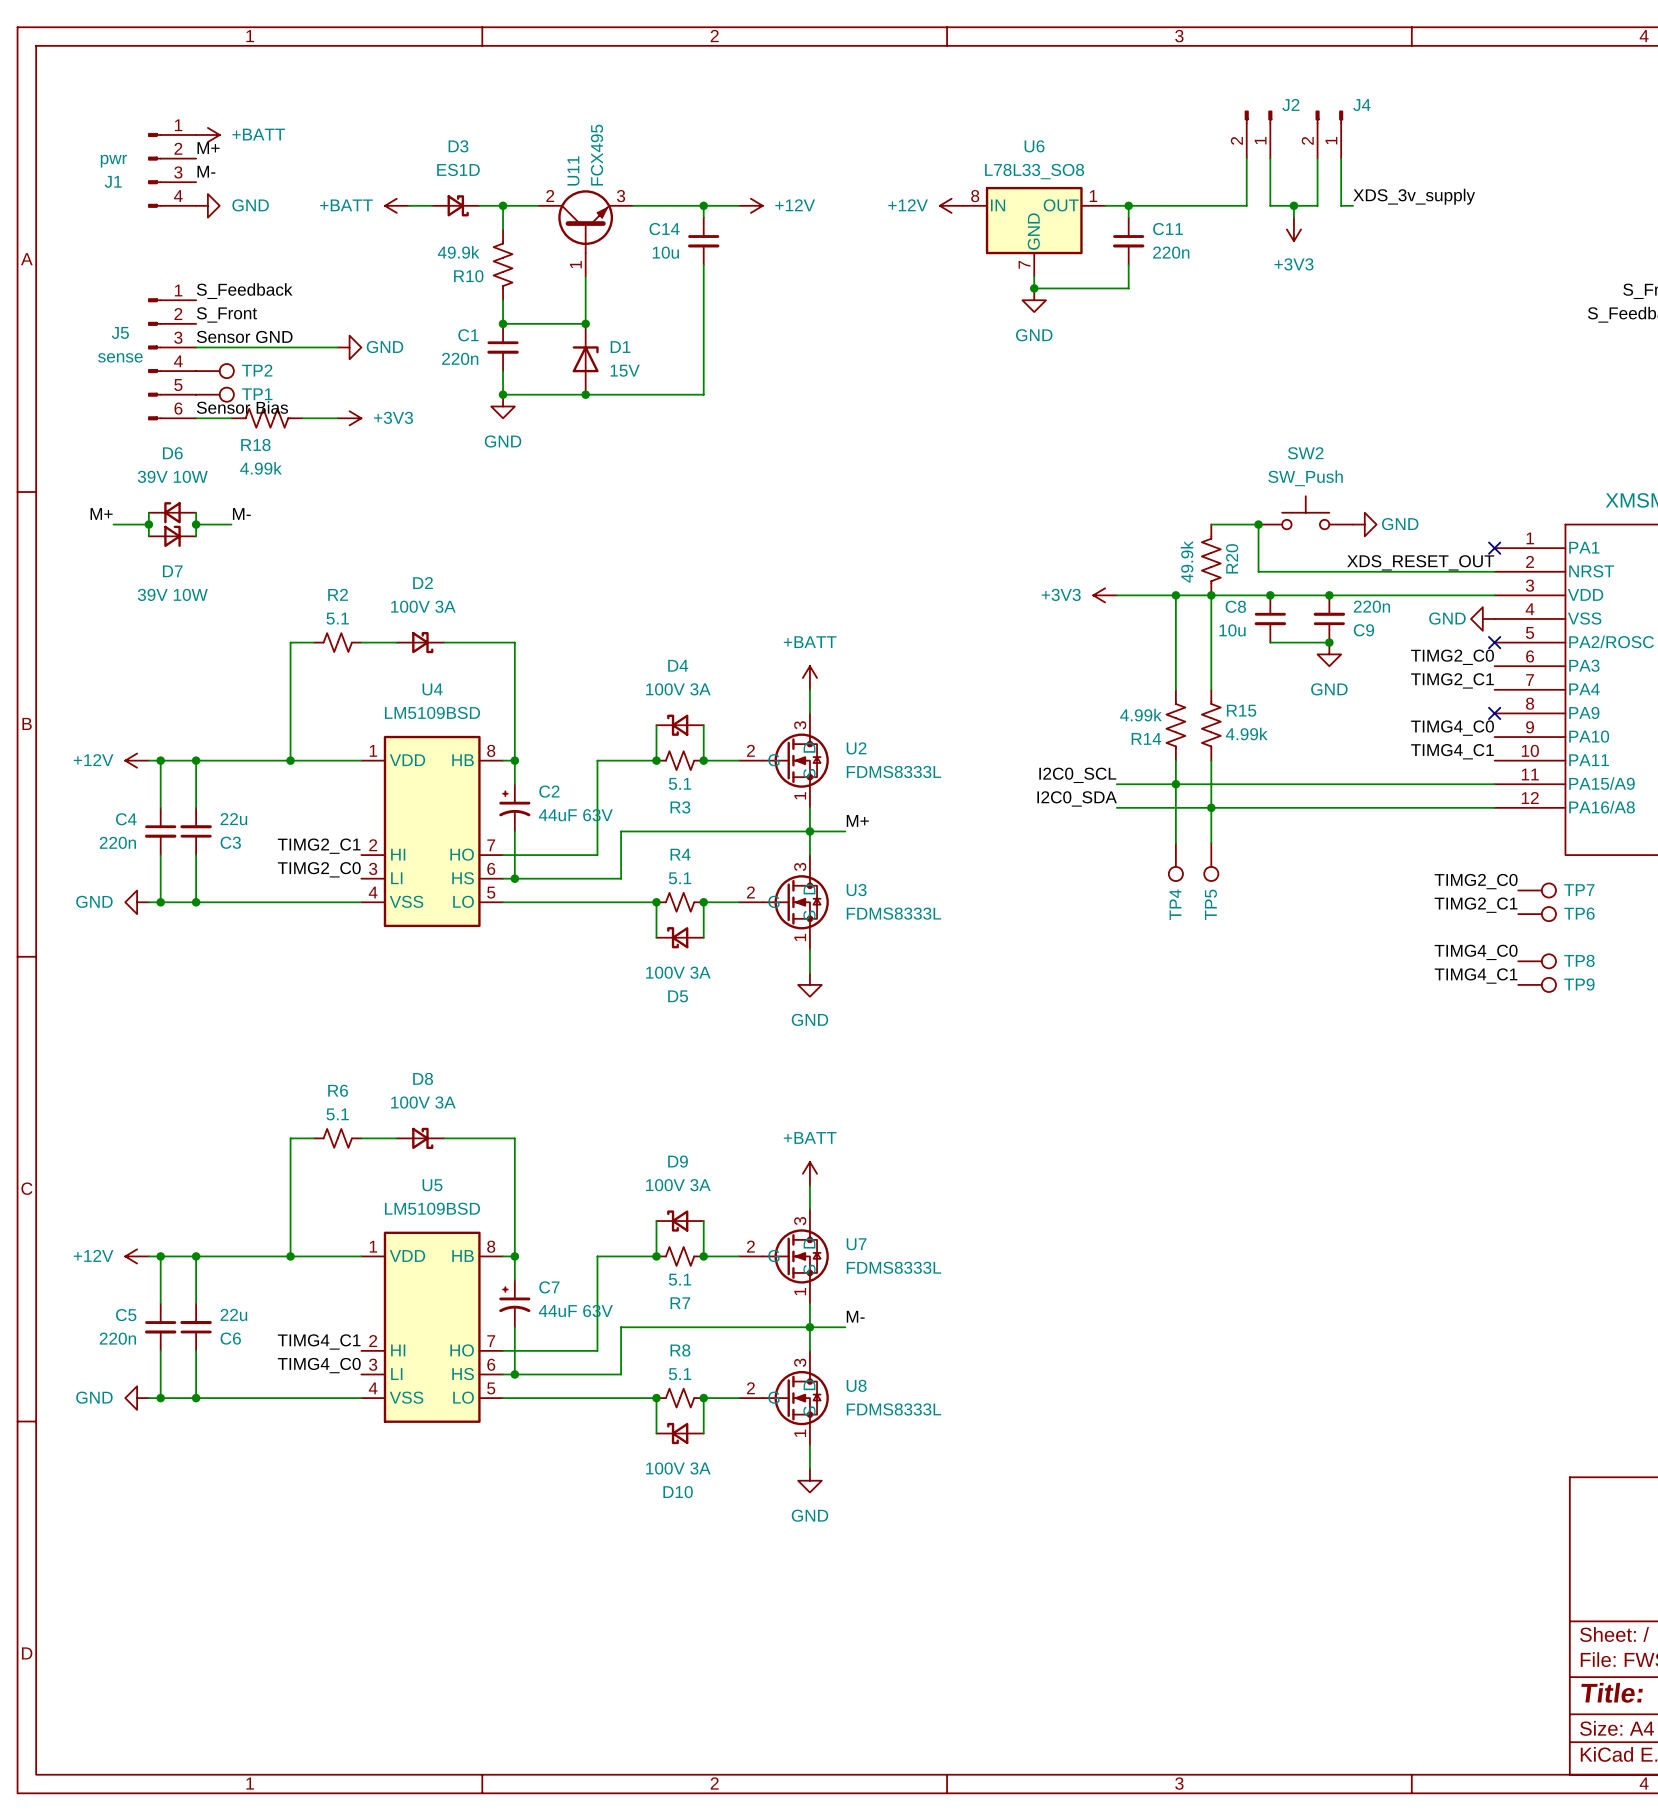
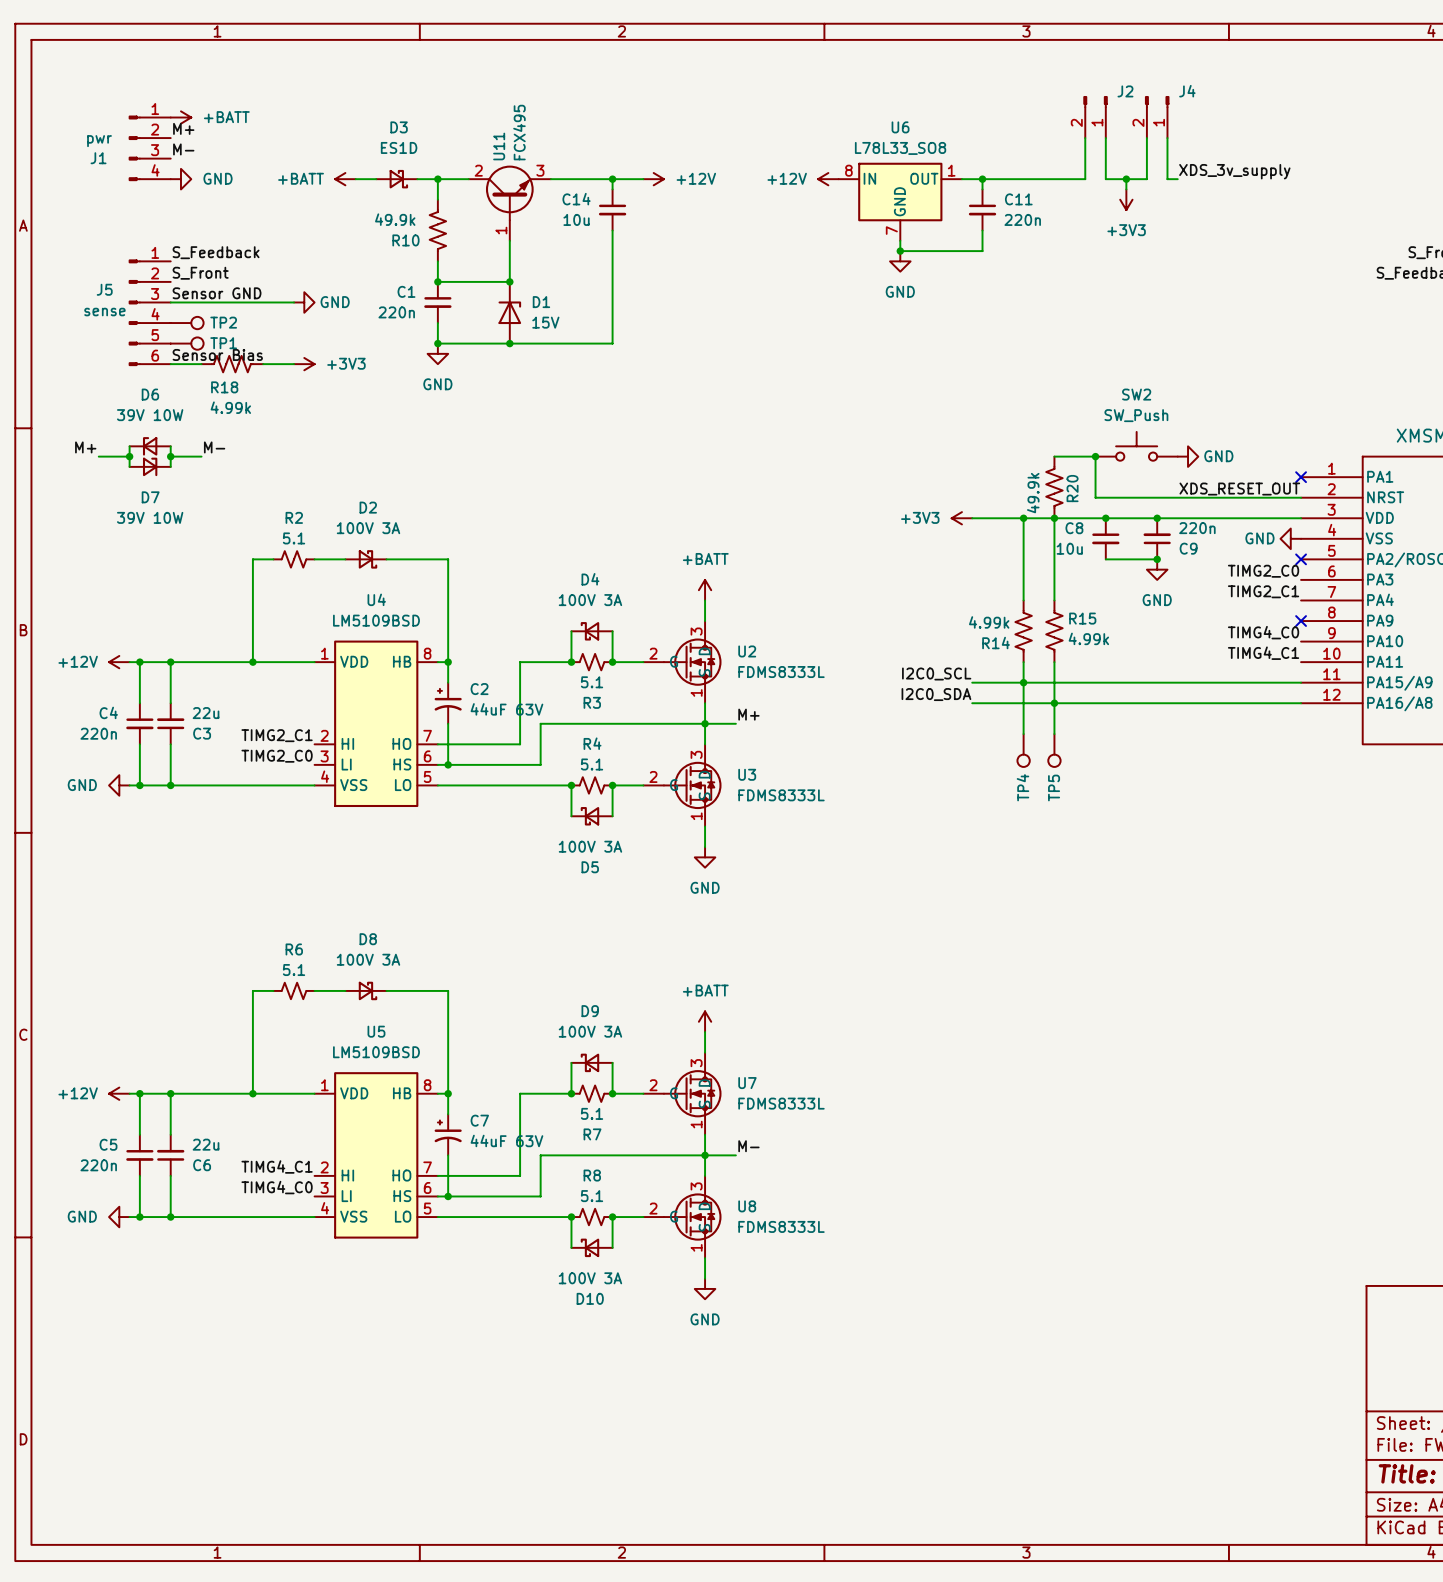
label: TIMG2_C0 (1476, 881) -> none
TP7: (1537, 890) -> none
label: TIMG2_C1 (1476, 905) -> none
TP6: (1537, 914) -> none
label: TIMG4_C0 (1476, 952) -> none
TP8: (1537, 961) -> none
label: TIMG4_C1 (1476, 976) -> none
TP9: (1537, 984) -> none

